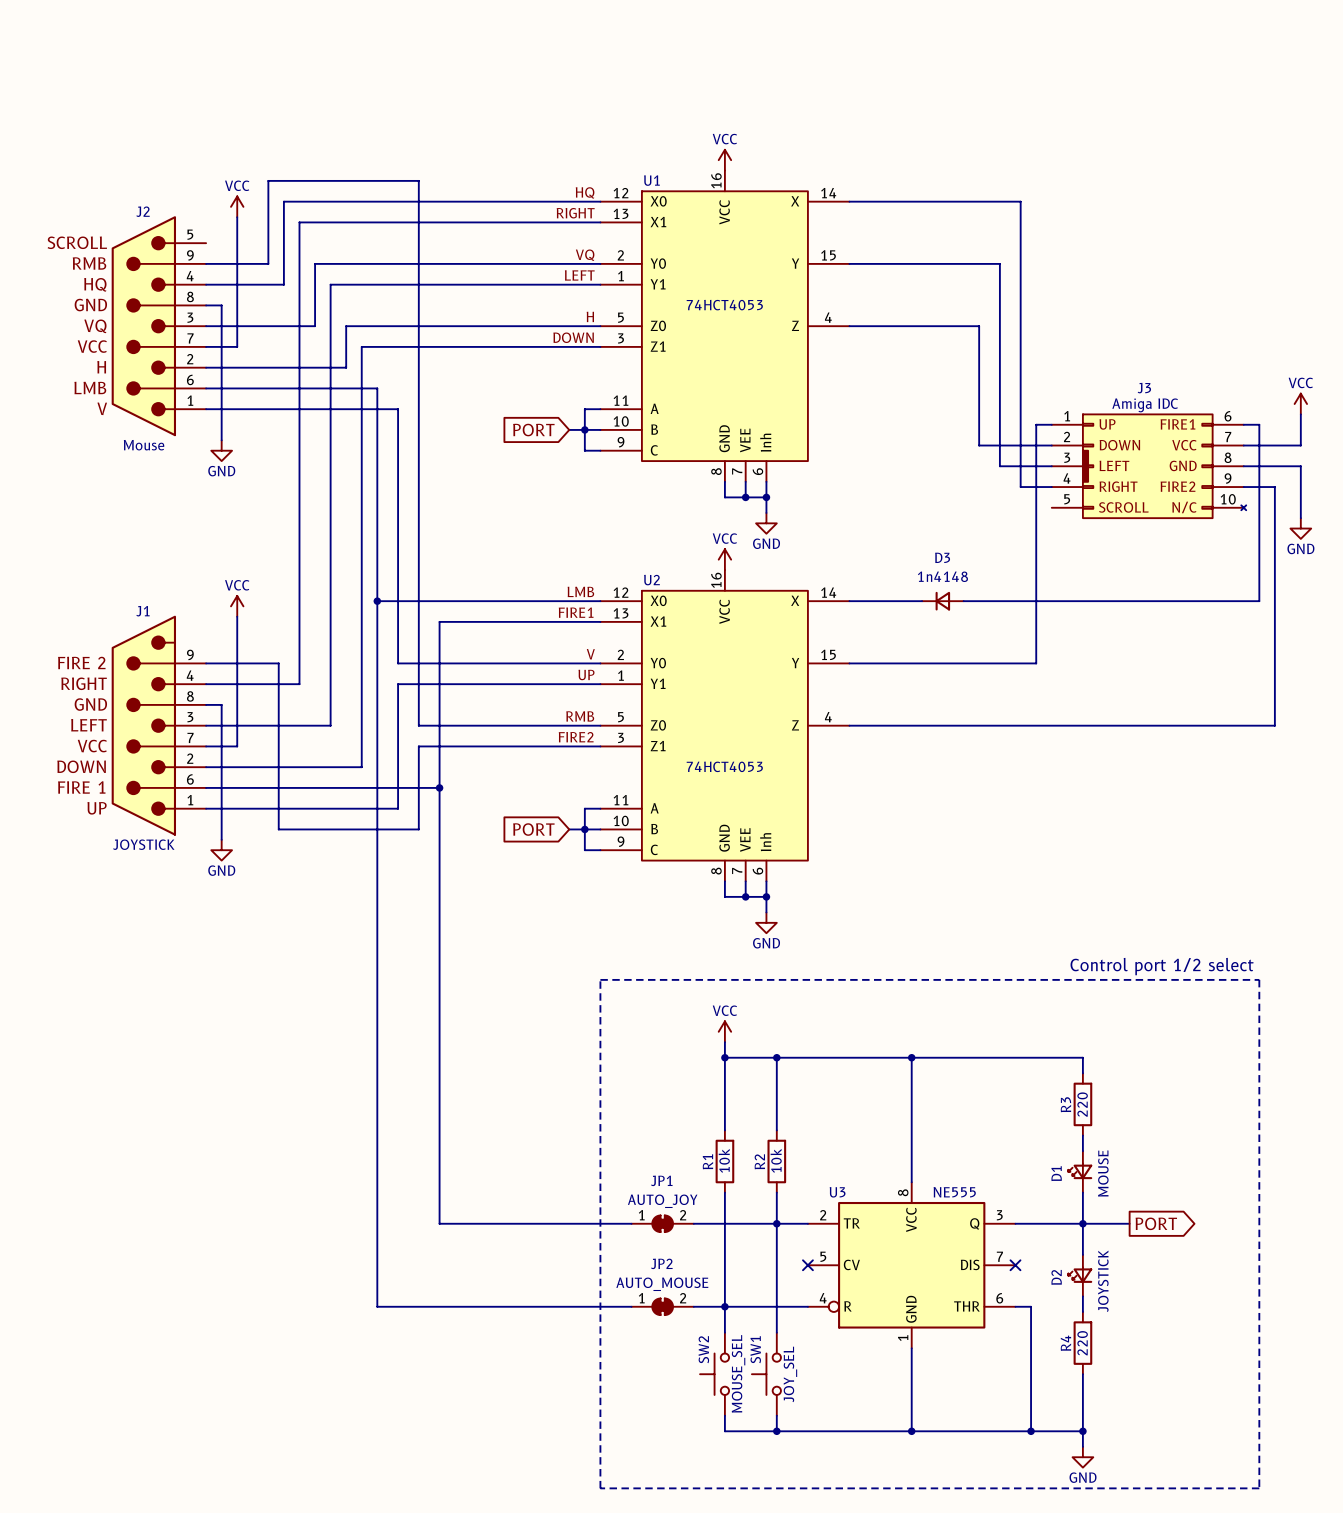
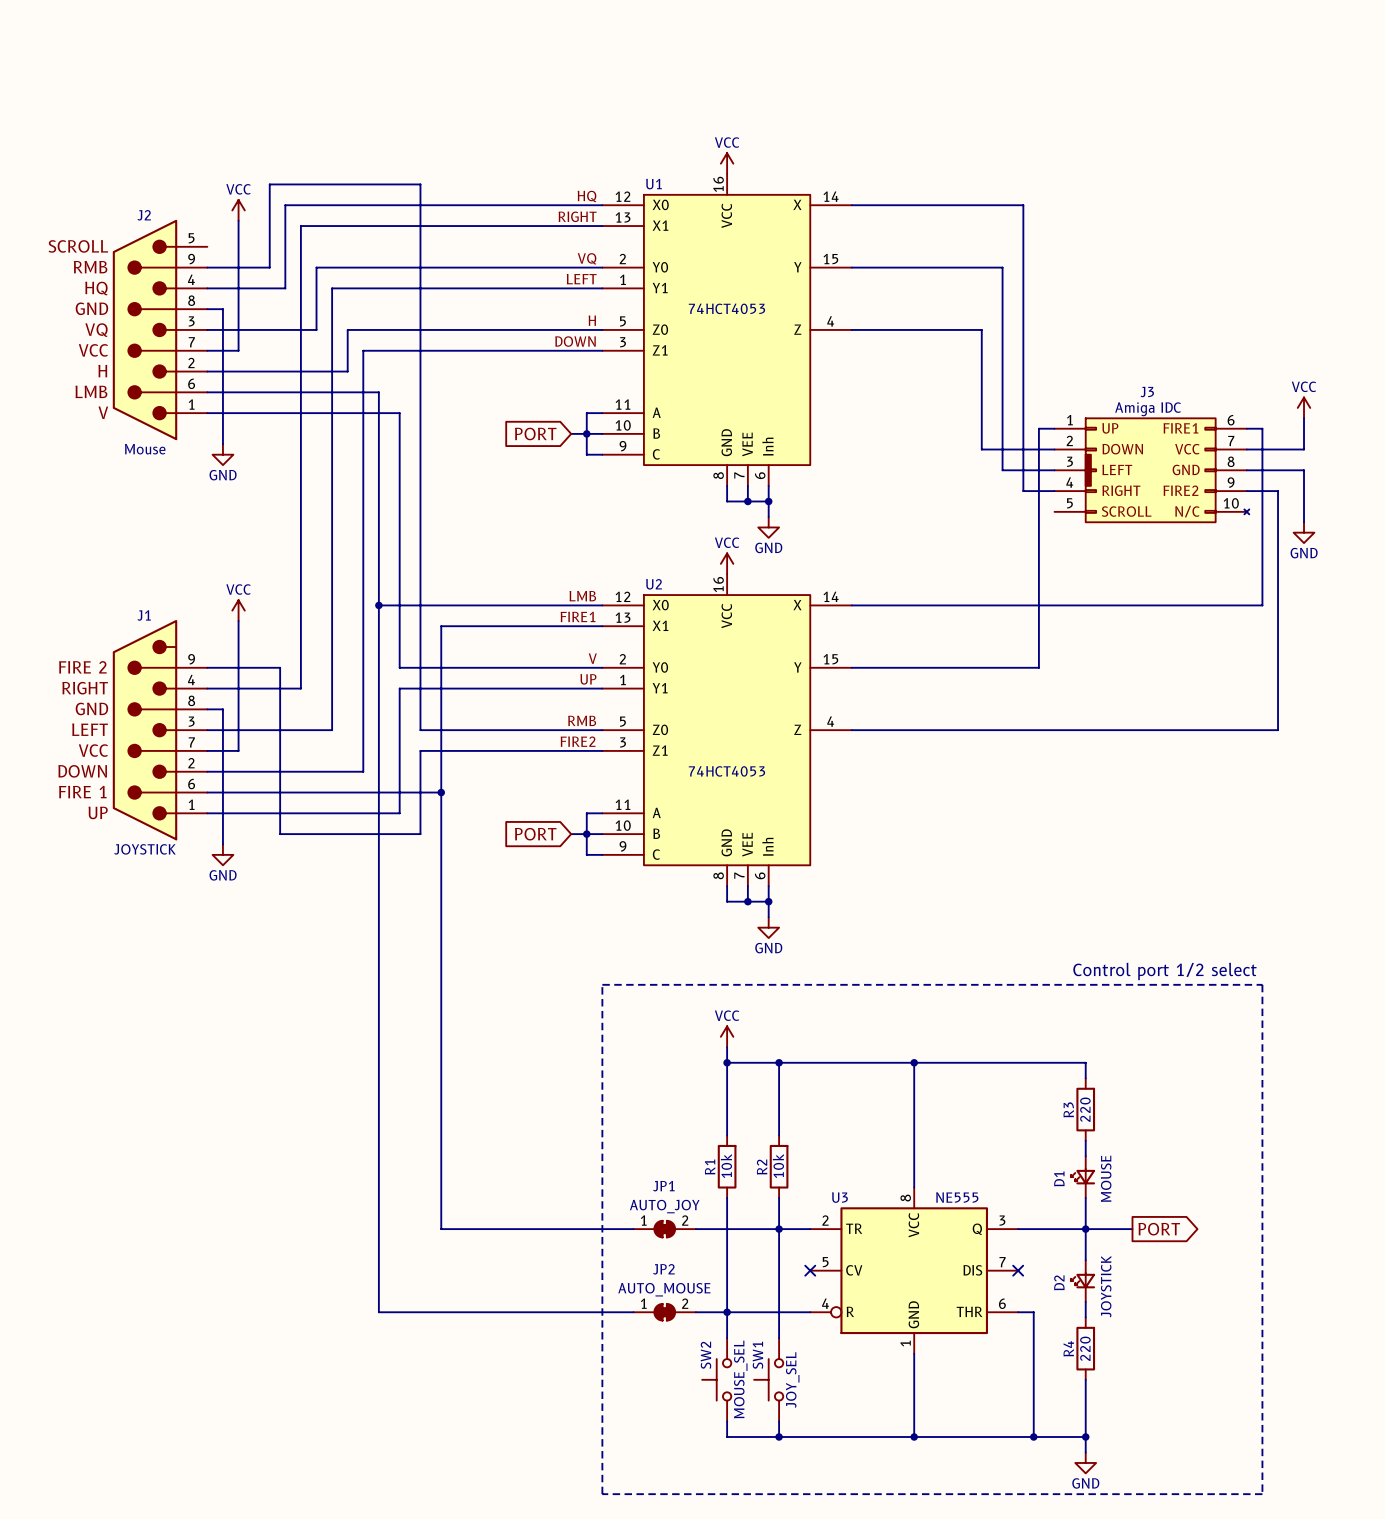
D3: 1n4148 (942, 601) -> none

